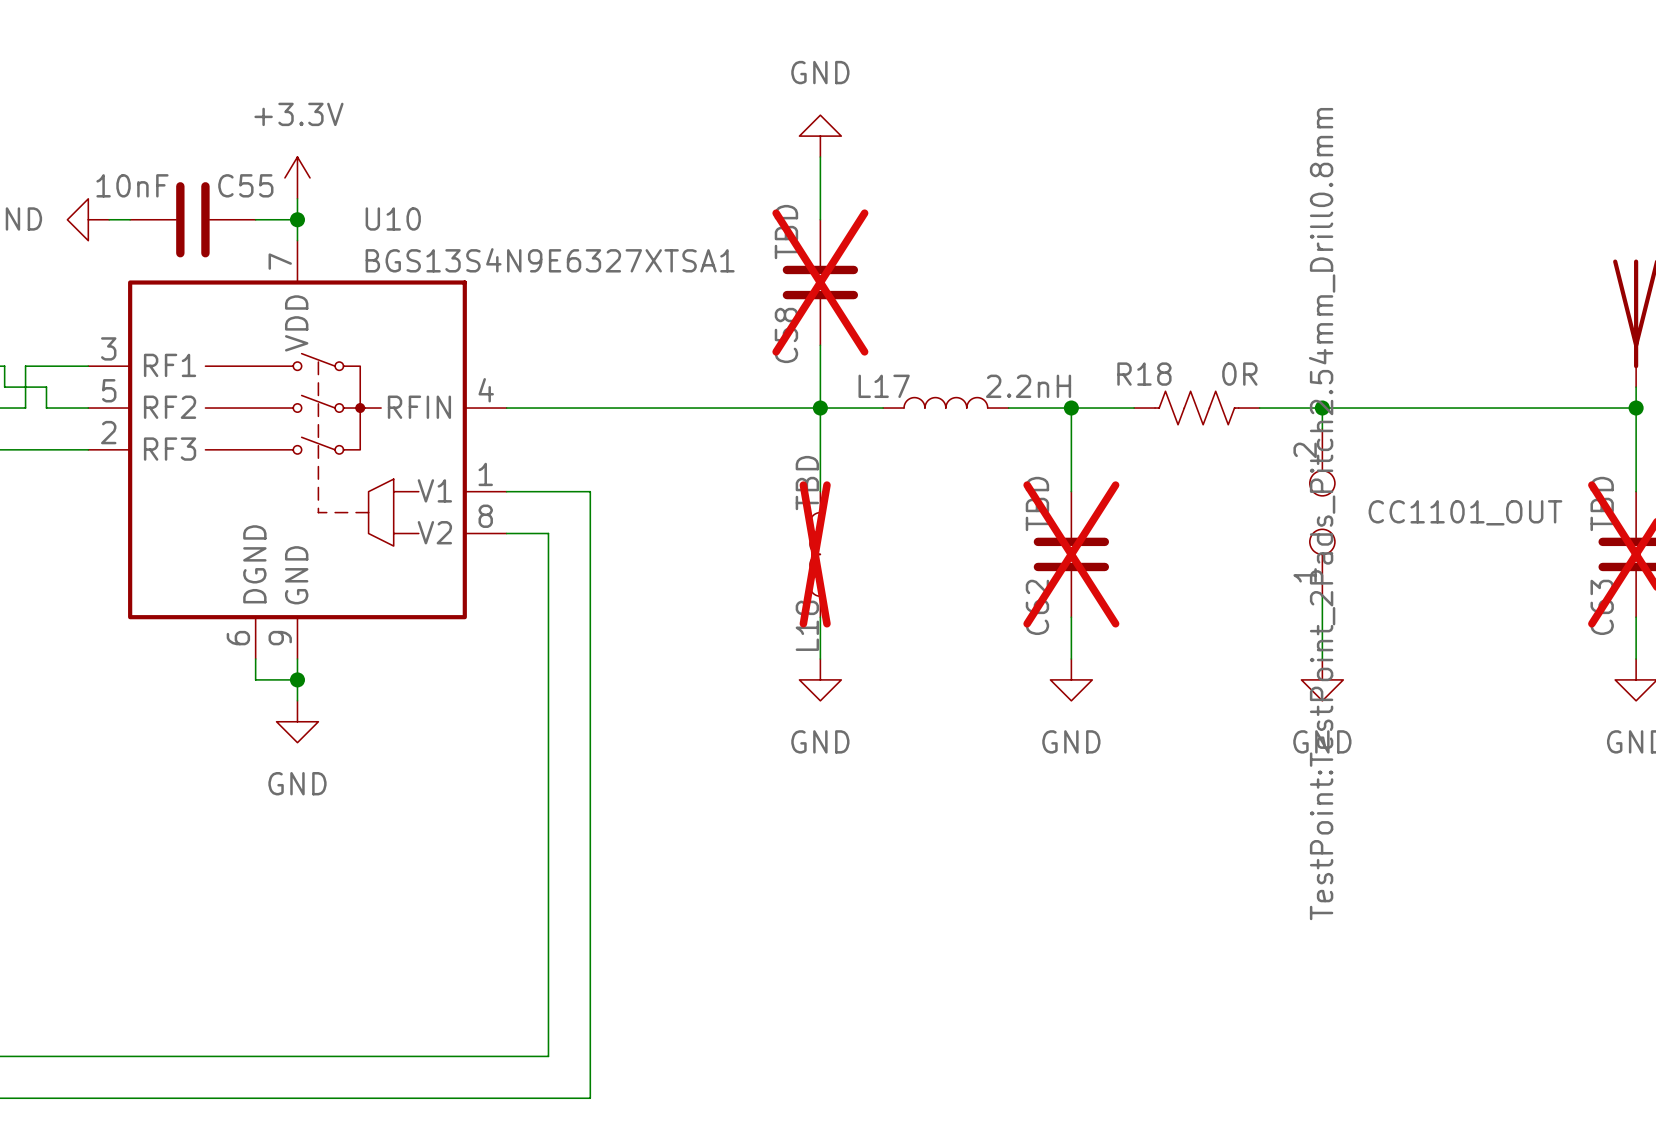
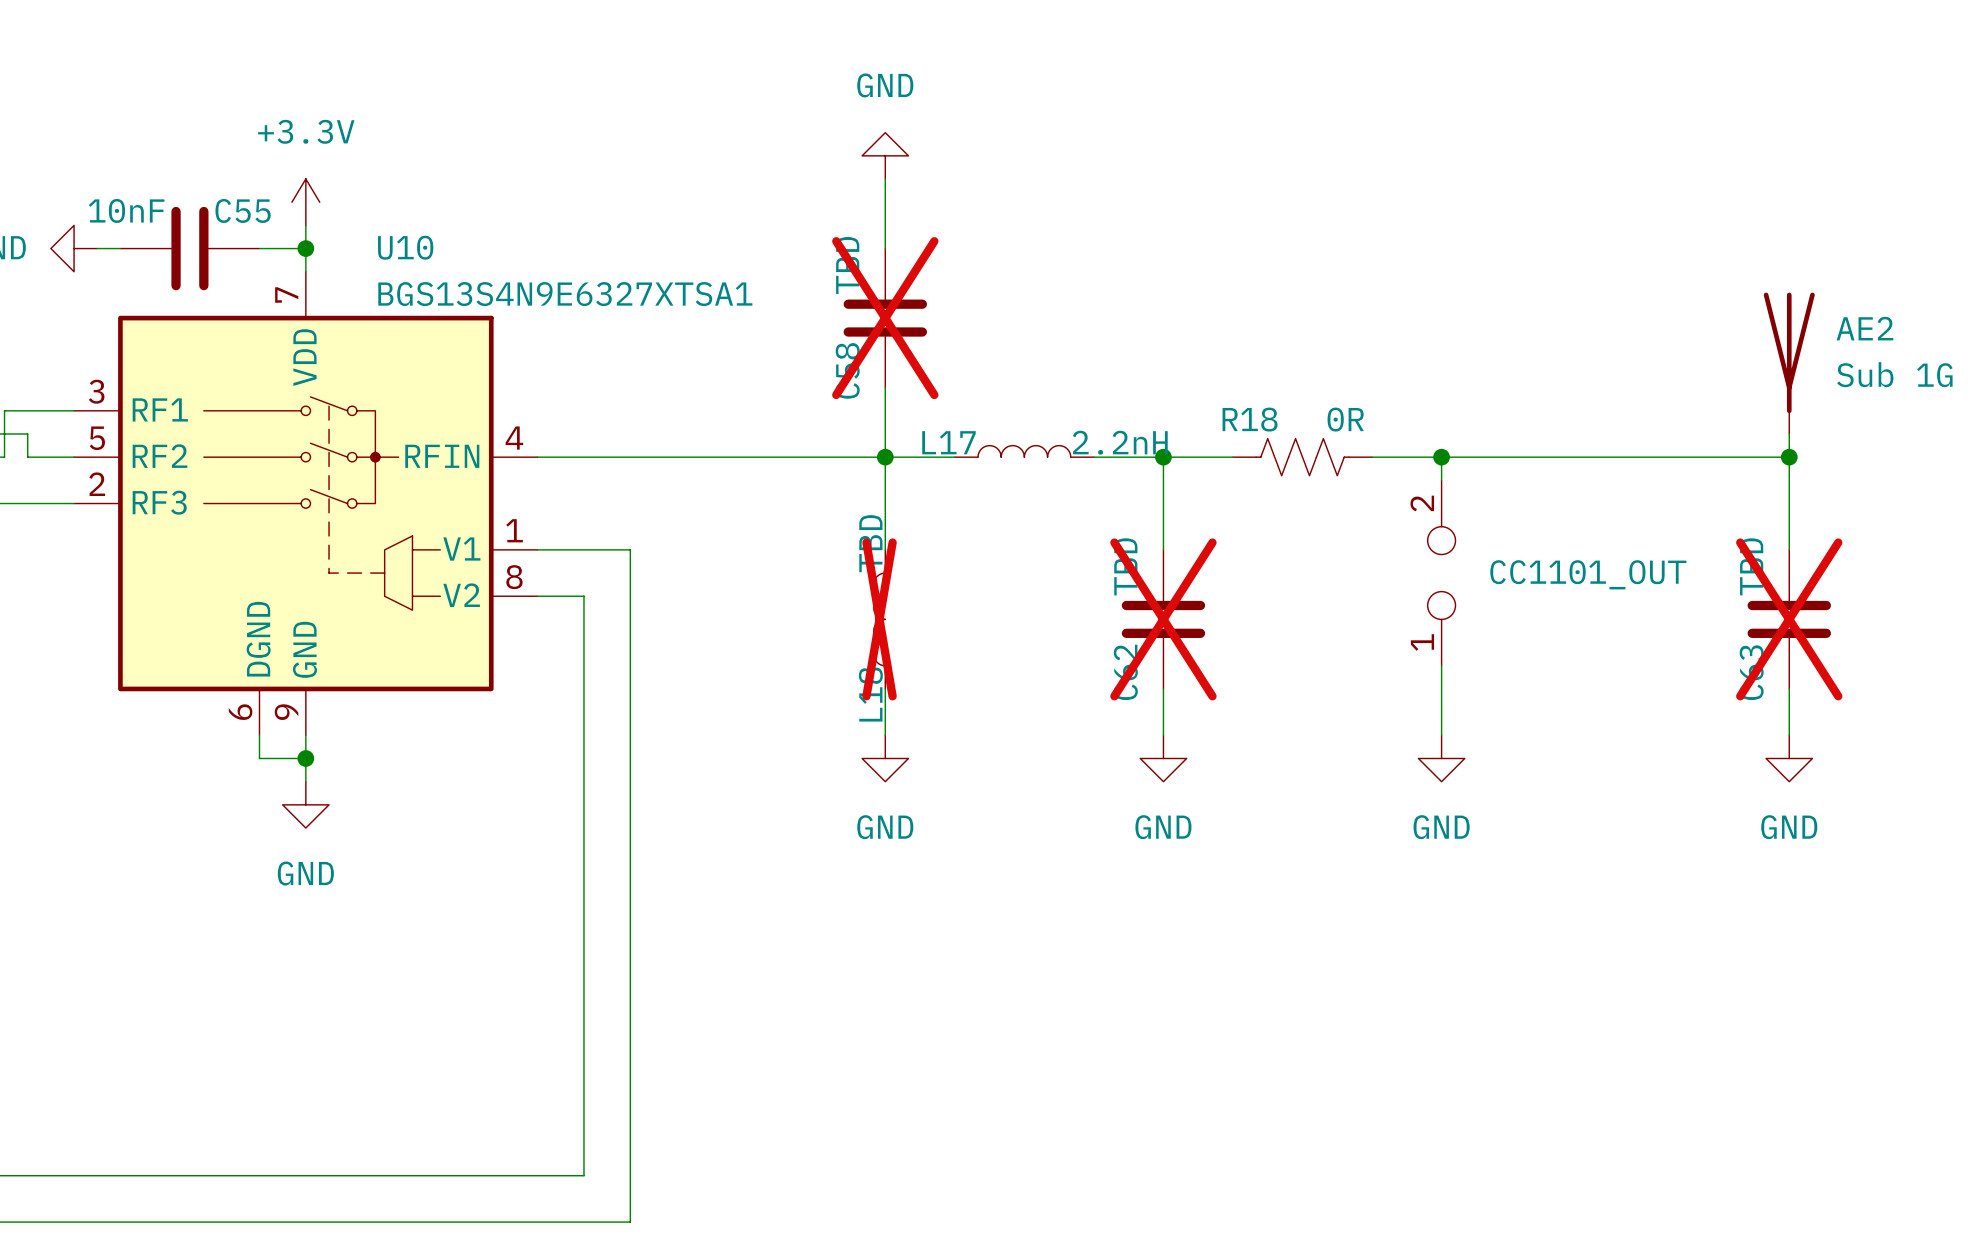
L17 name position: L17 (884, 386) -> L17 (948, 442)
L17 value position: 2.2nH (1028, 386) -> 2.2nH (1120, 442)
part text: TestPoint:TestPoint_2Pads_Pitch2.54mm_Drill0.8mm (1322, 514) -> none

